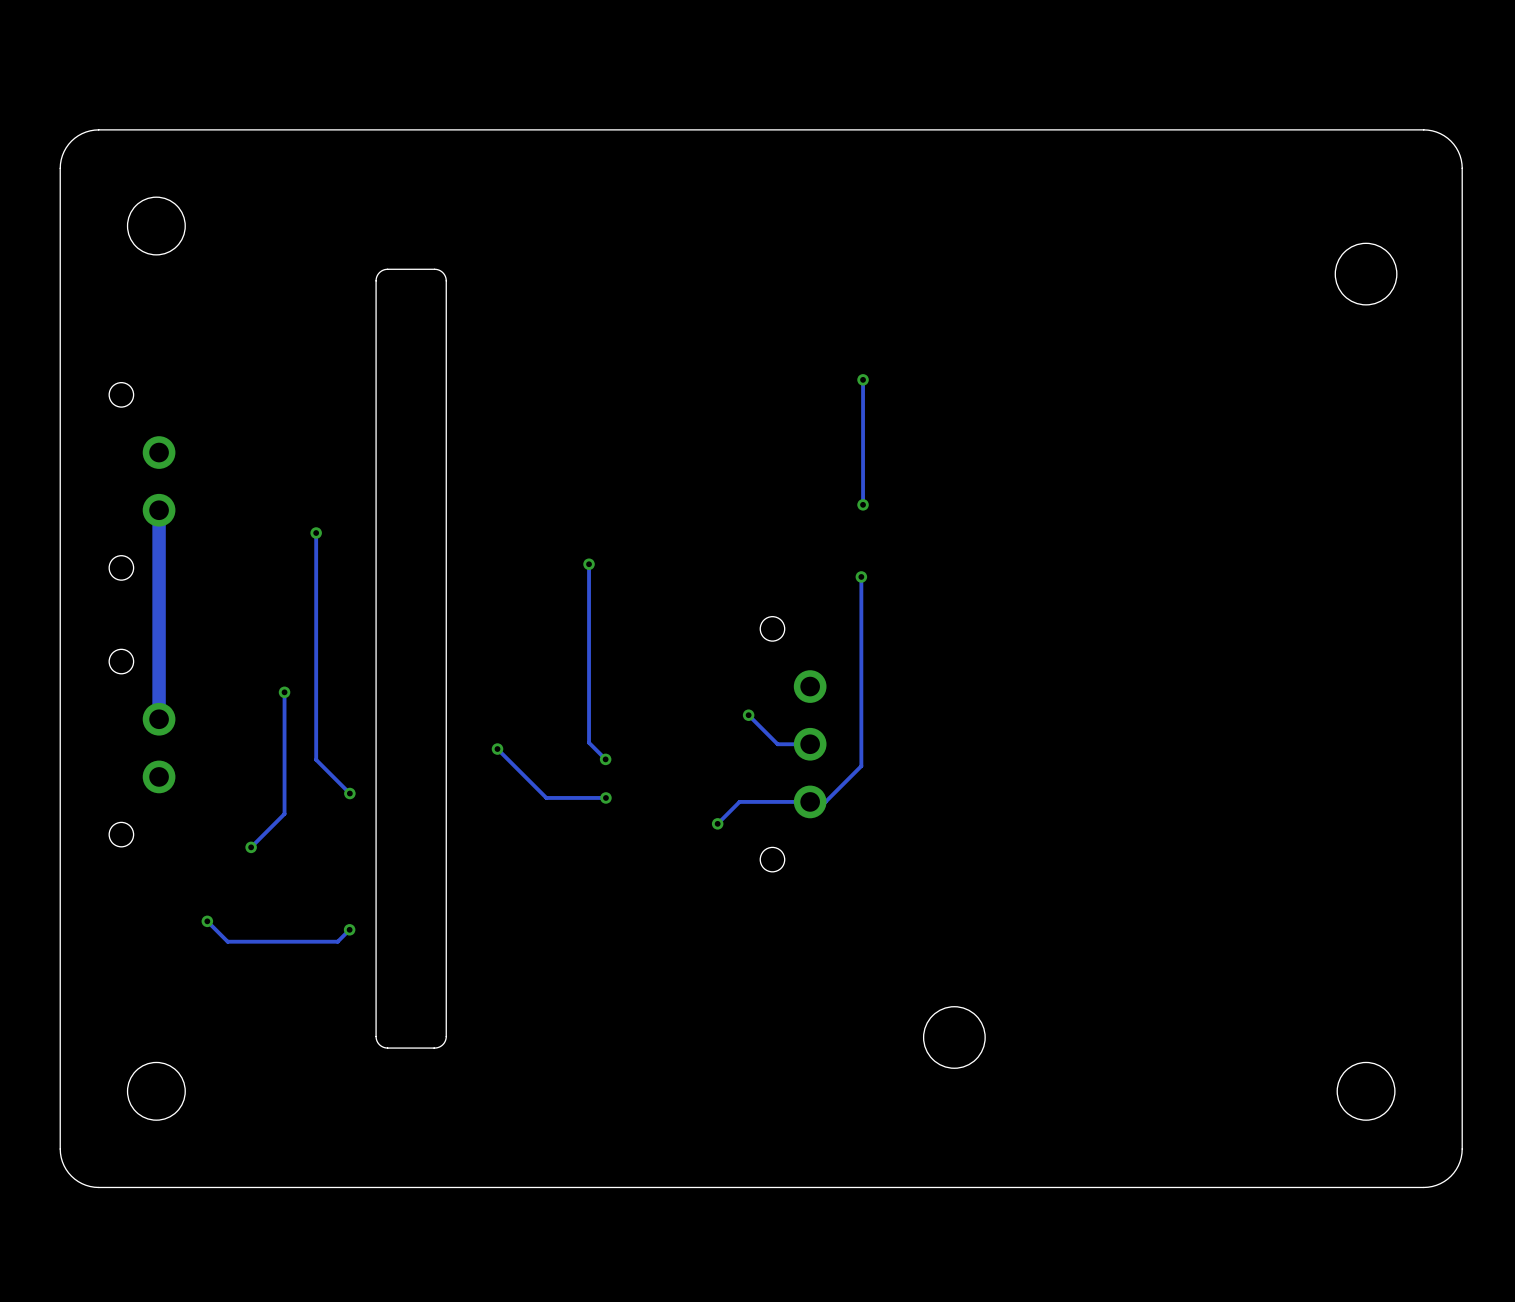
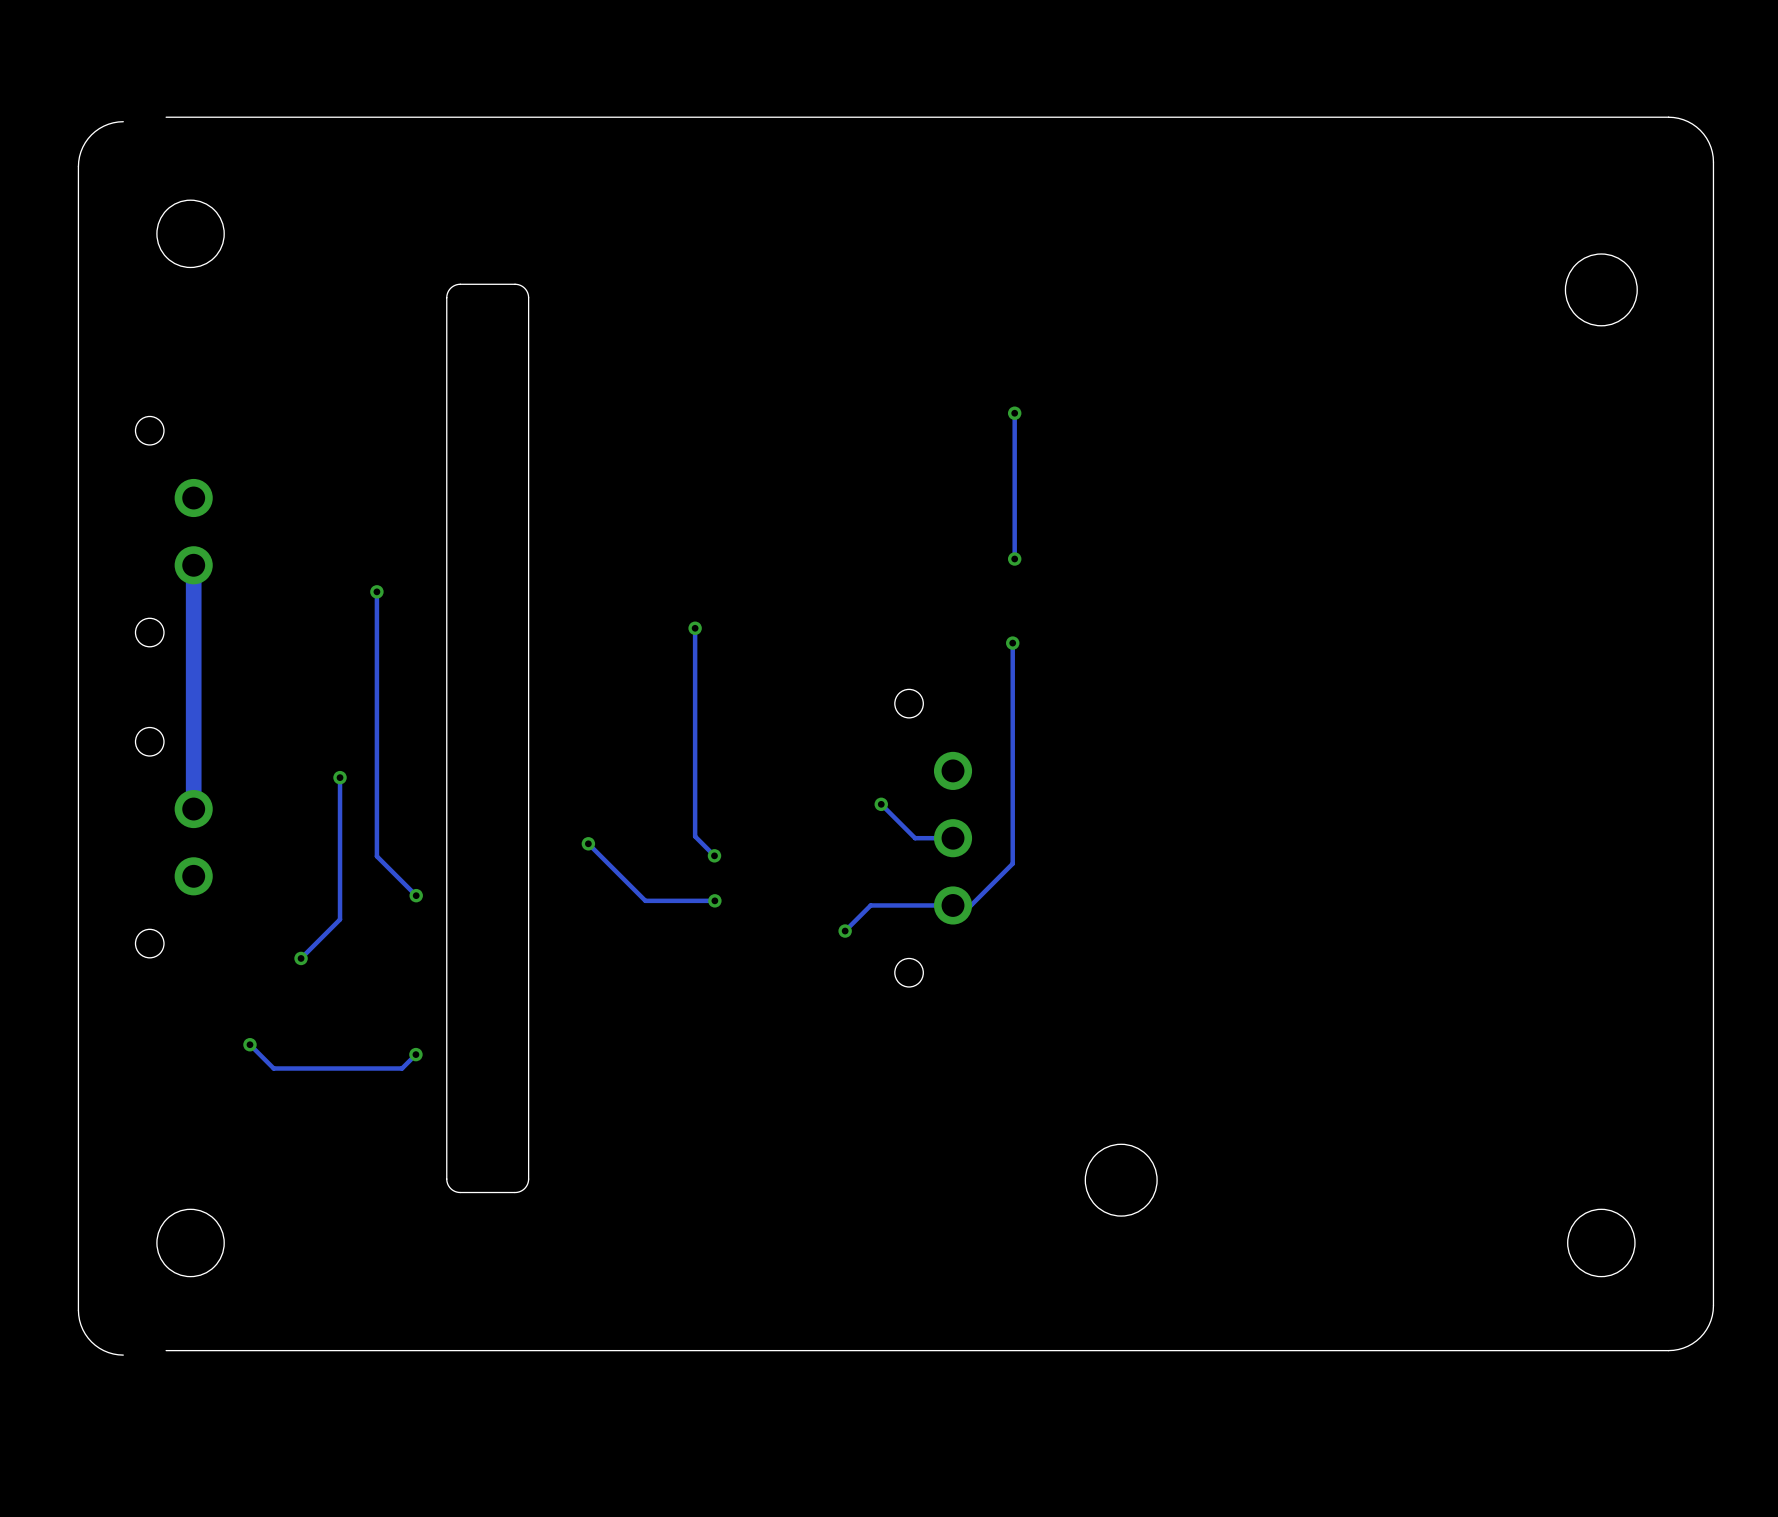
board edge: (98, 129) (1423, 129) (1436, 132) (1450, 141) (1458, 151) (1462, 168) -> (166, 117) (1668, 117) (1688, 121) (1700, 130) (1710, 147) (1713, 166)
board edge: (1462, 1145) (1460, 1161) (1450, 1176) (1440, 1183) (1423, 1187) (98, 1187) -> (1713, 1305) (1710, 1320) (1700, 1337) (1688, 1346) (1668, 1350) (166, 1350)

